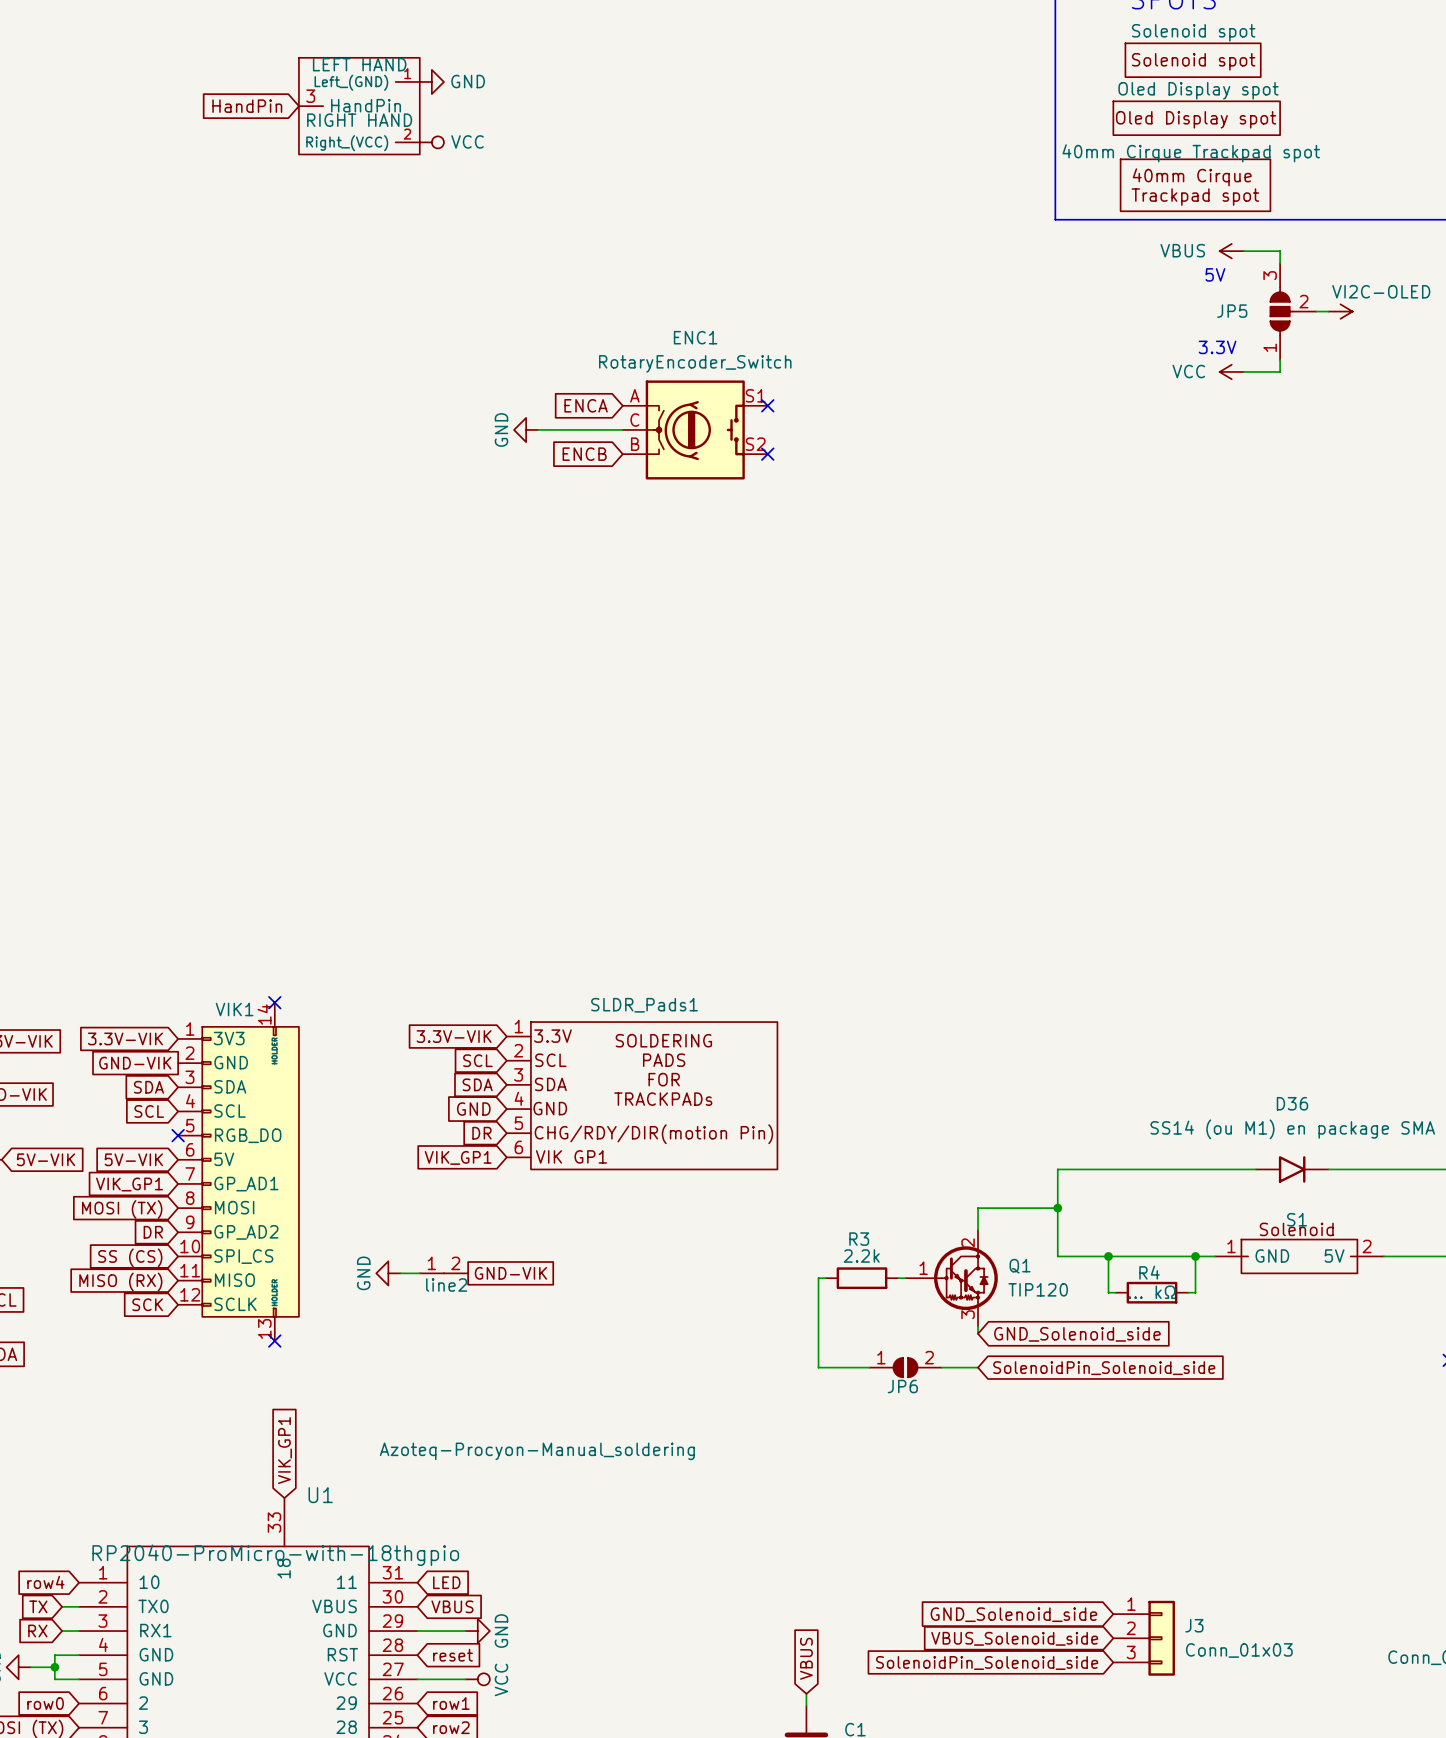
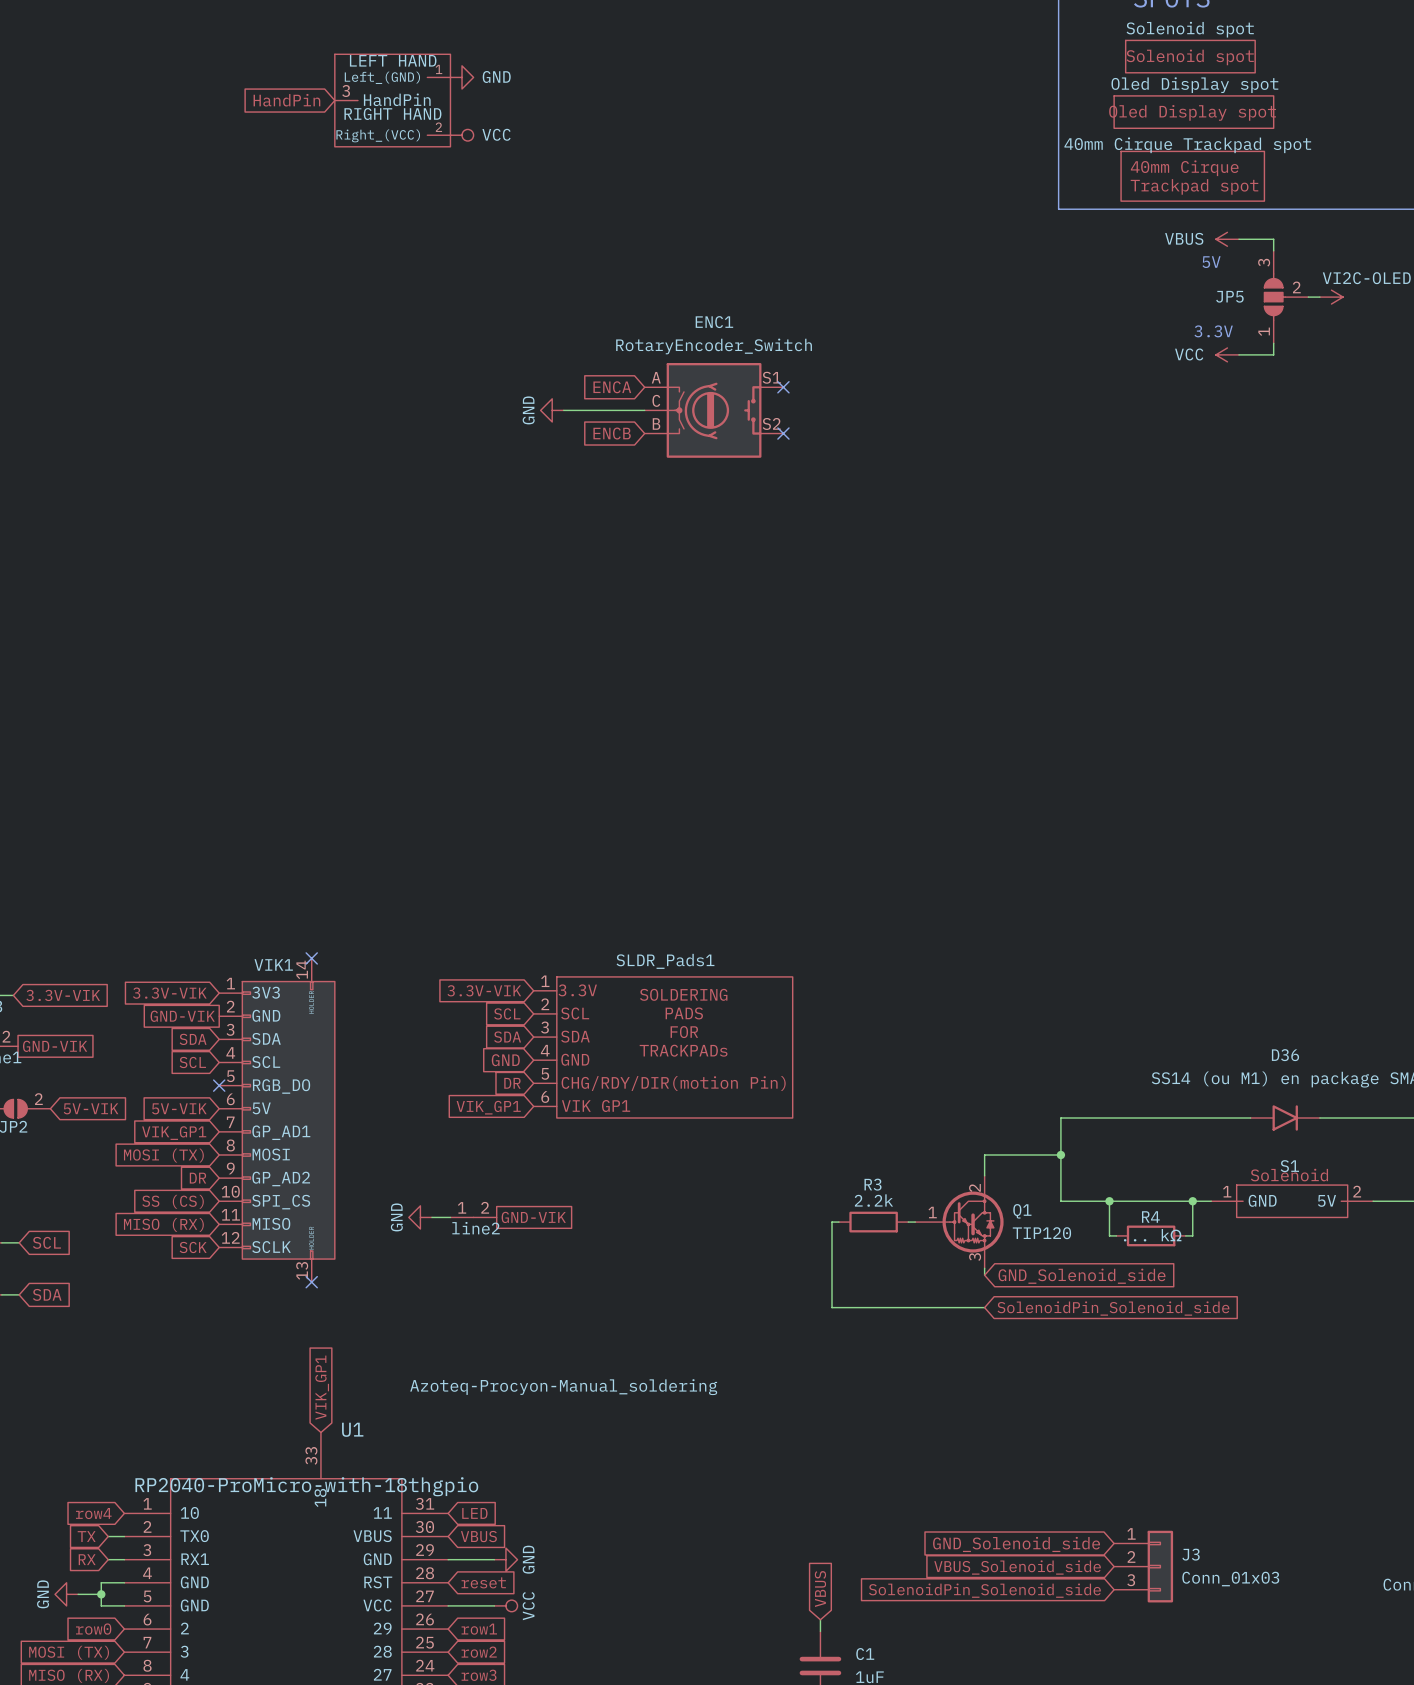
JP6: (905, 1367) -> none

